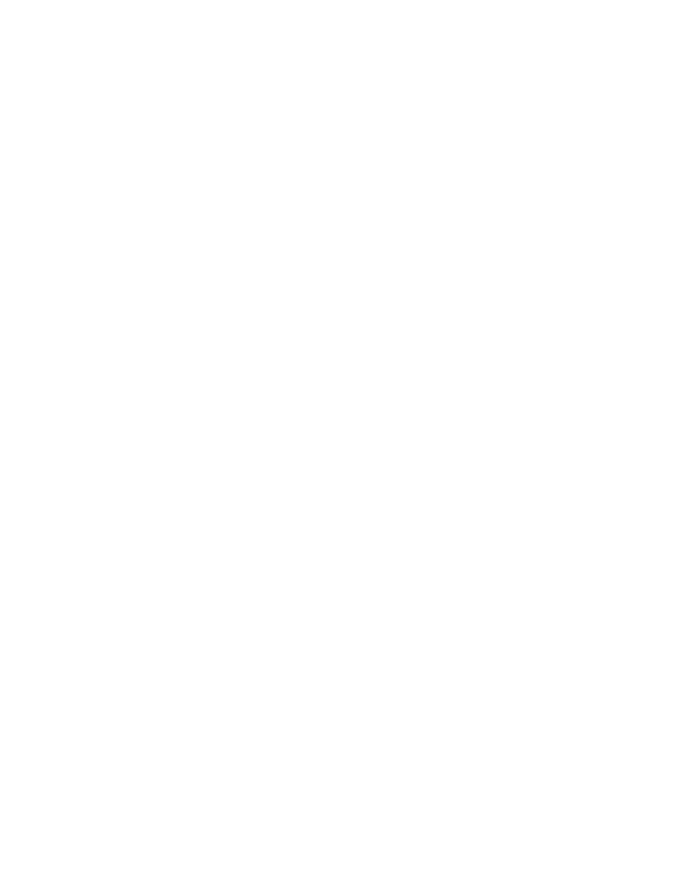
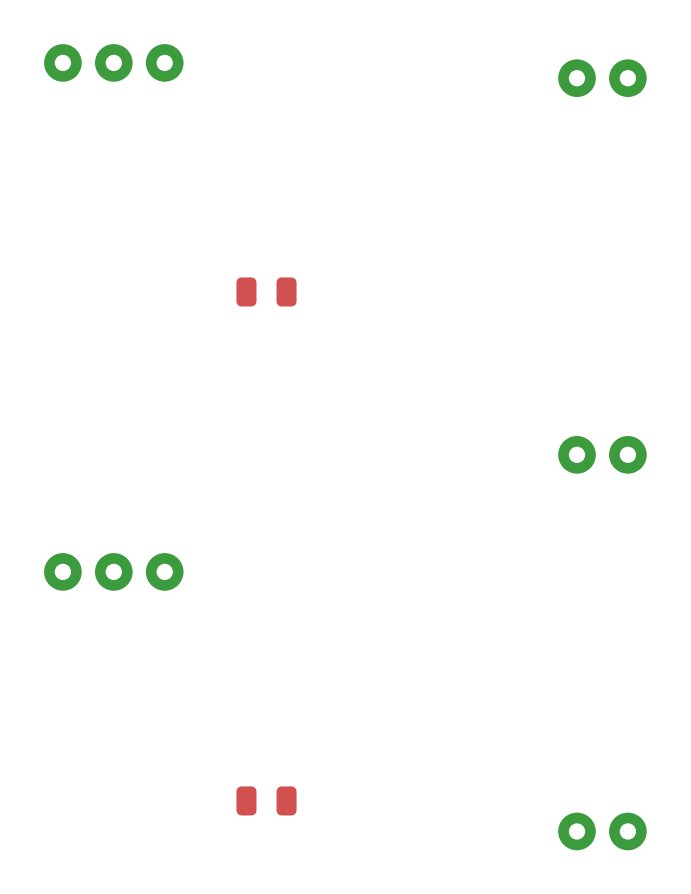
part: none -> (113, 62)
part: none -> (602, 78)
part: none -> (266, 291)
part: none -> (602, 454)
part: none -> (113, 571)
part: none -> (266, 800)
part: none -> (602, 831)

